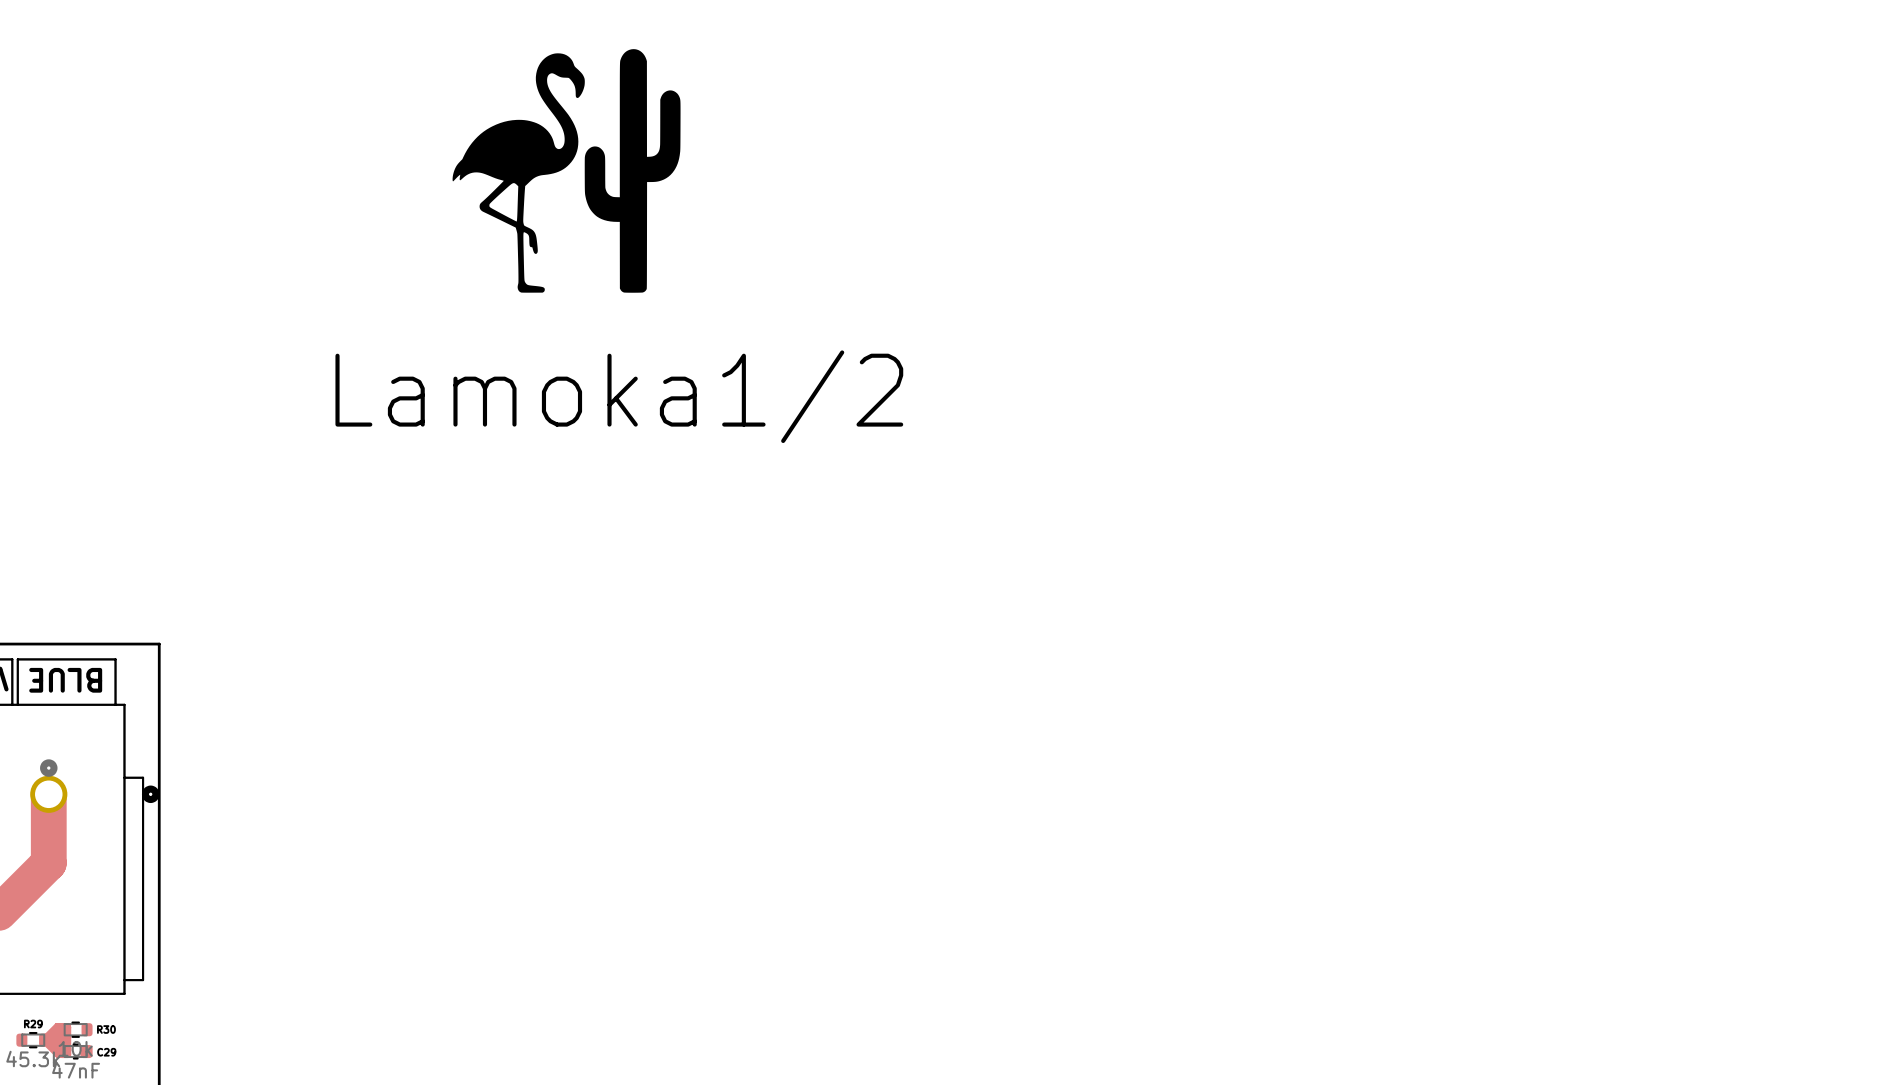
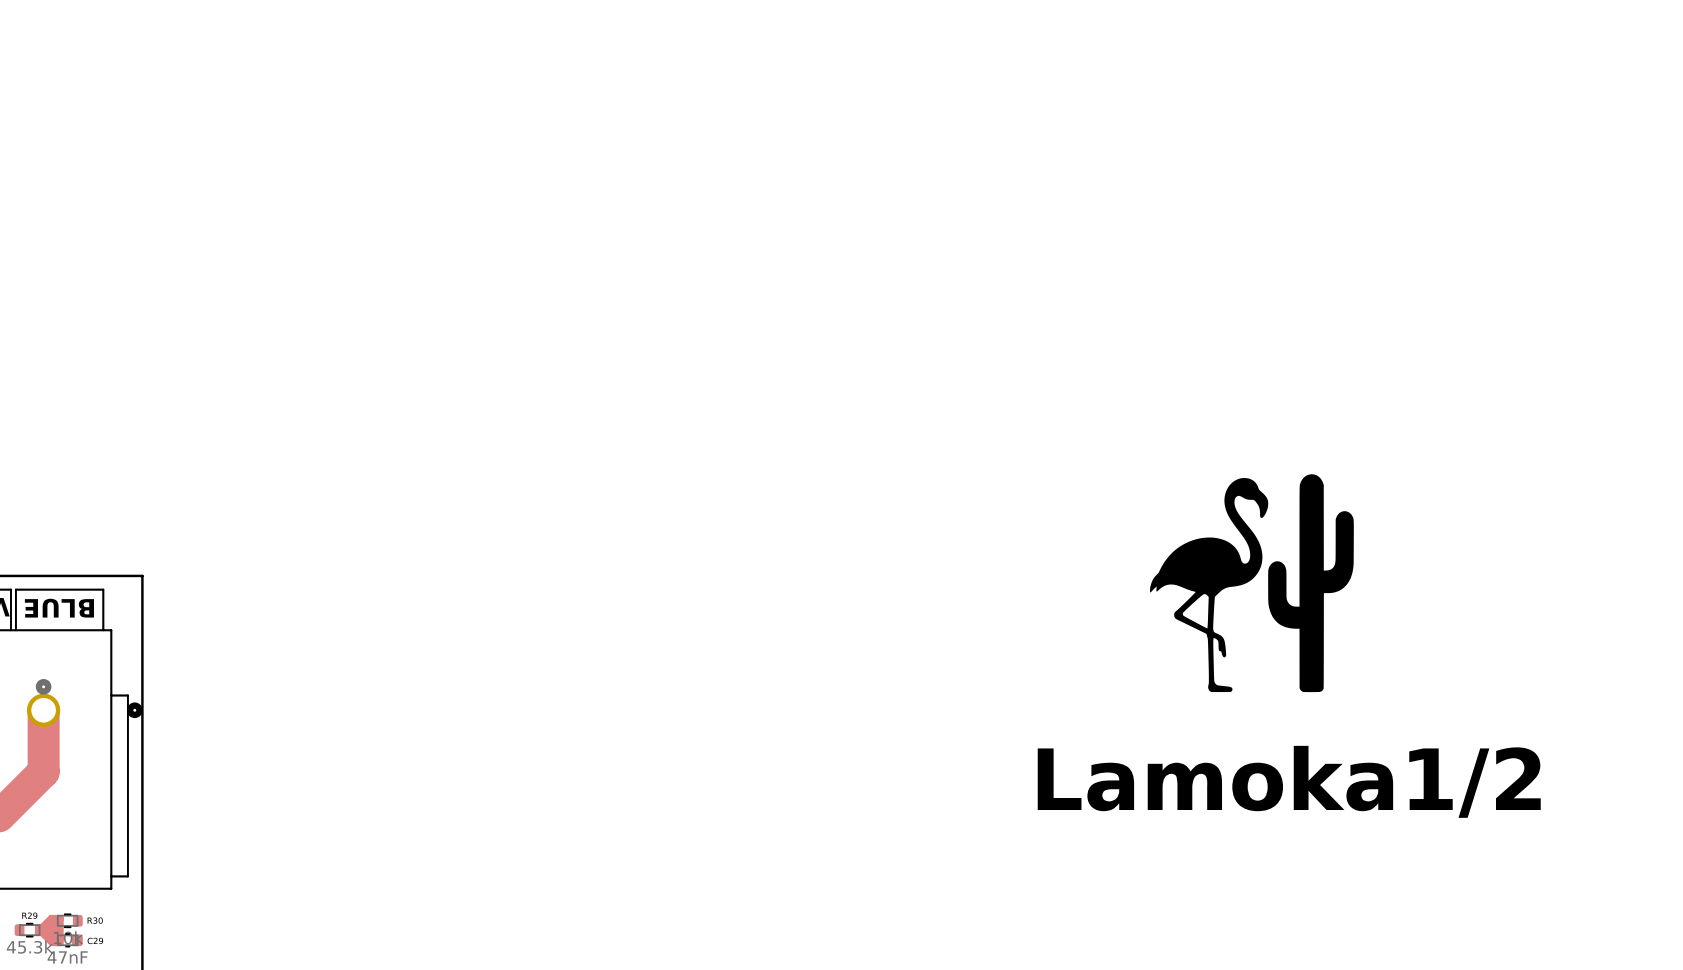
drawing: [452, 49, 681, 293] -> none
text: Lamoka1/2 (619, 396) -> none
drawing: none -> [1149, 474, 1354, 693]
text: none -> Lamoka1/2 (1289, 781)

